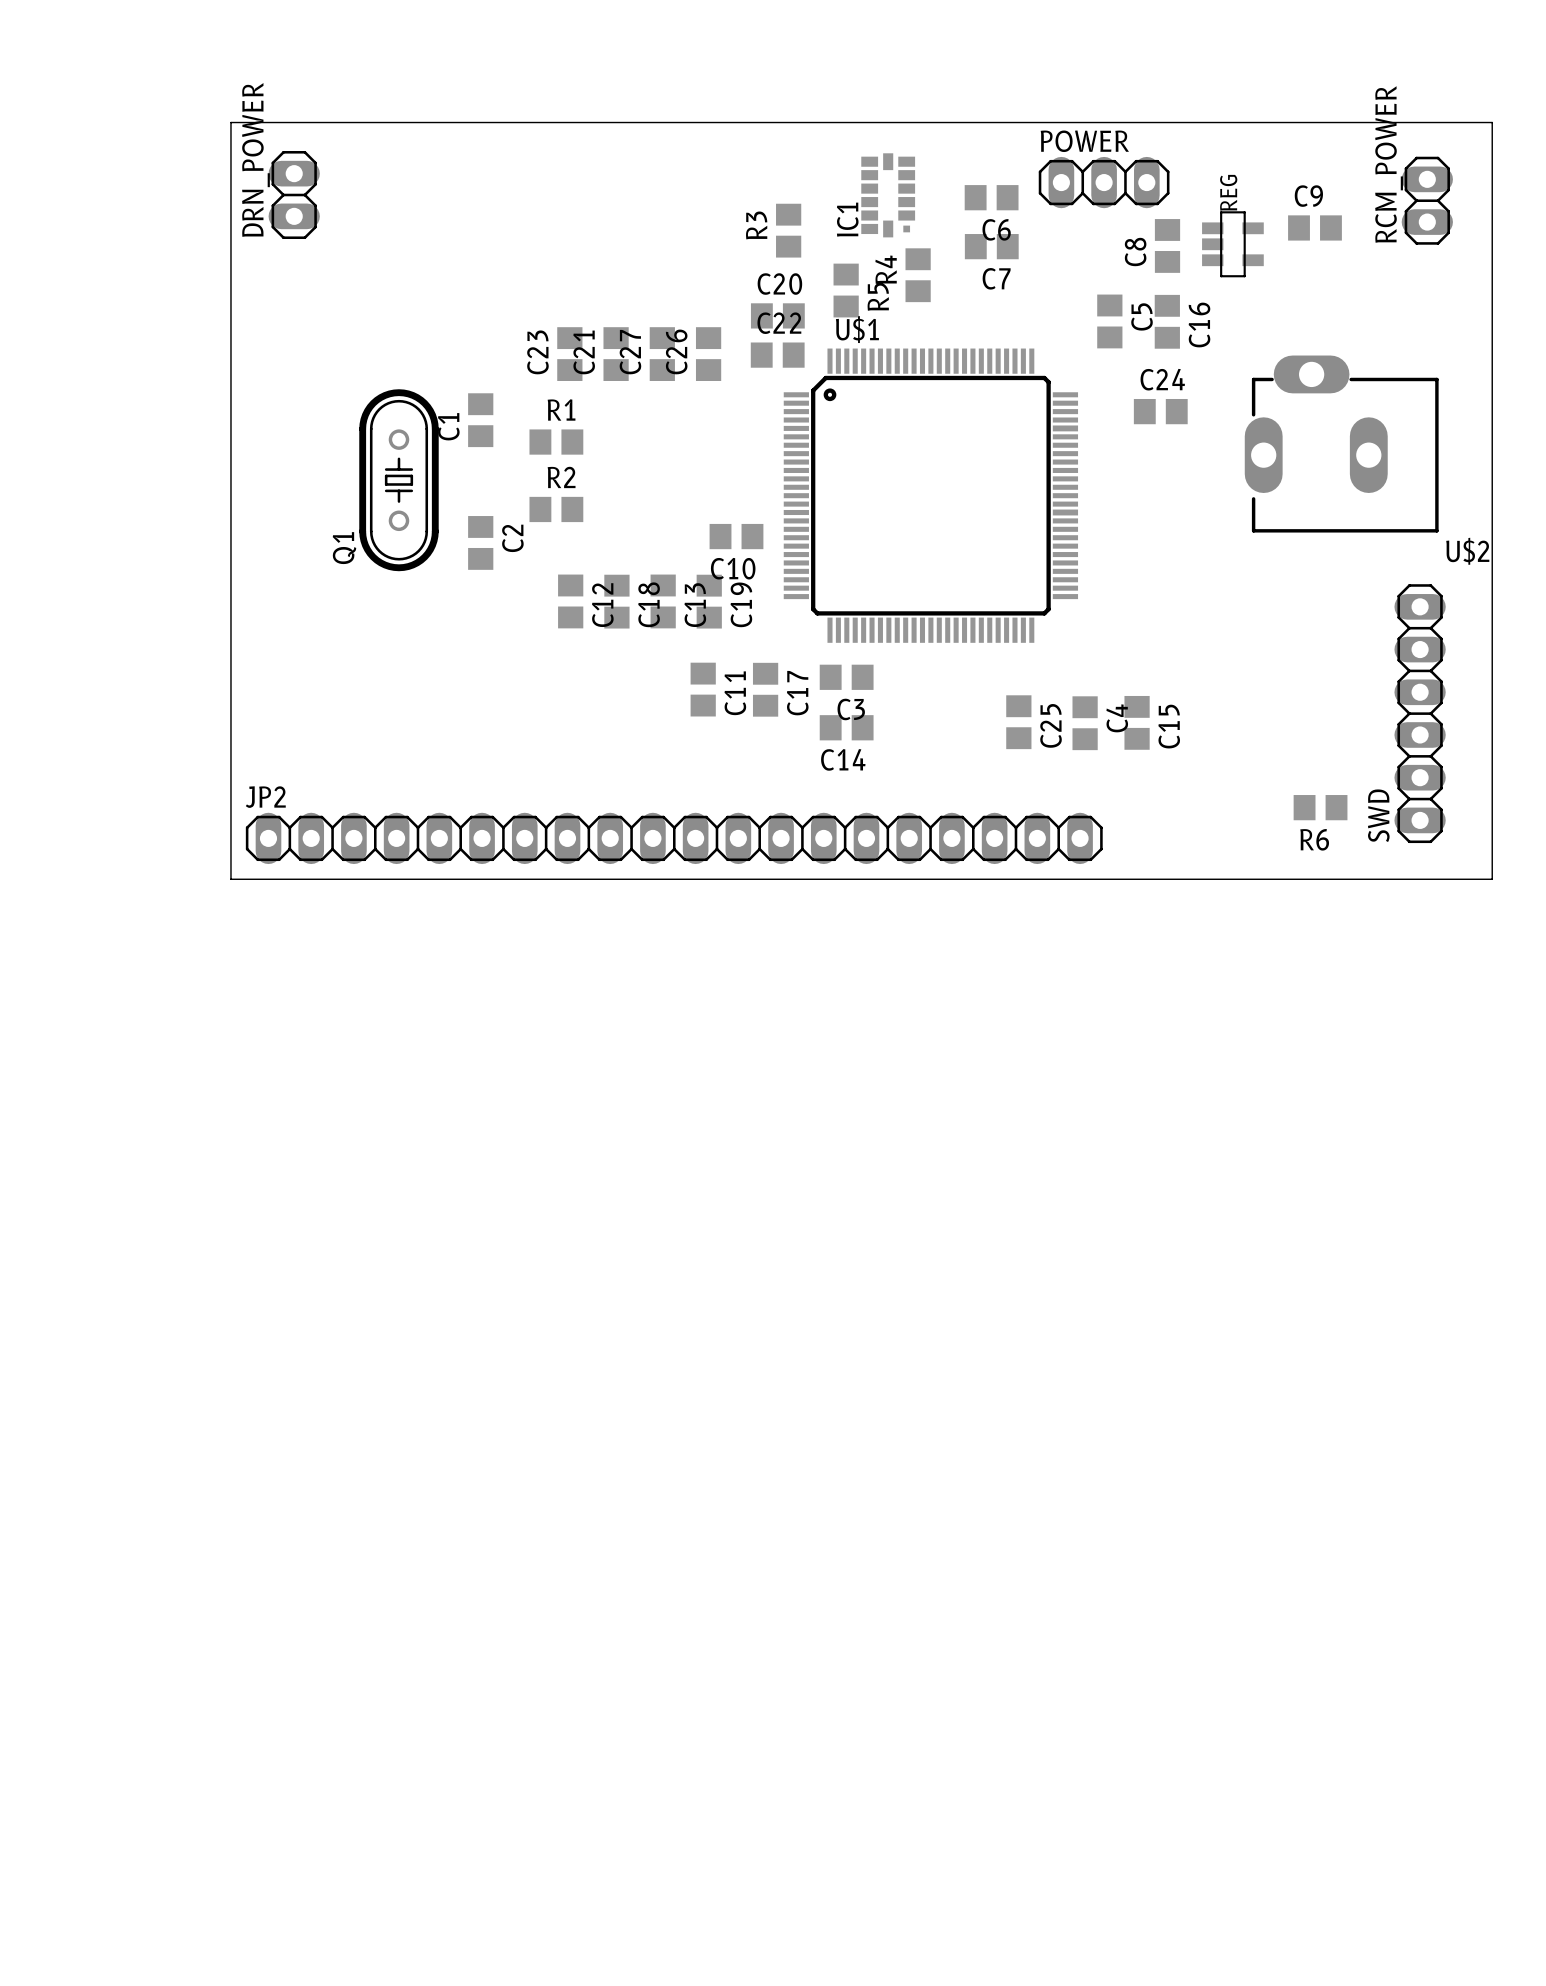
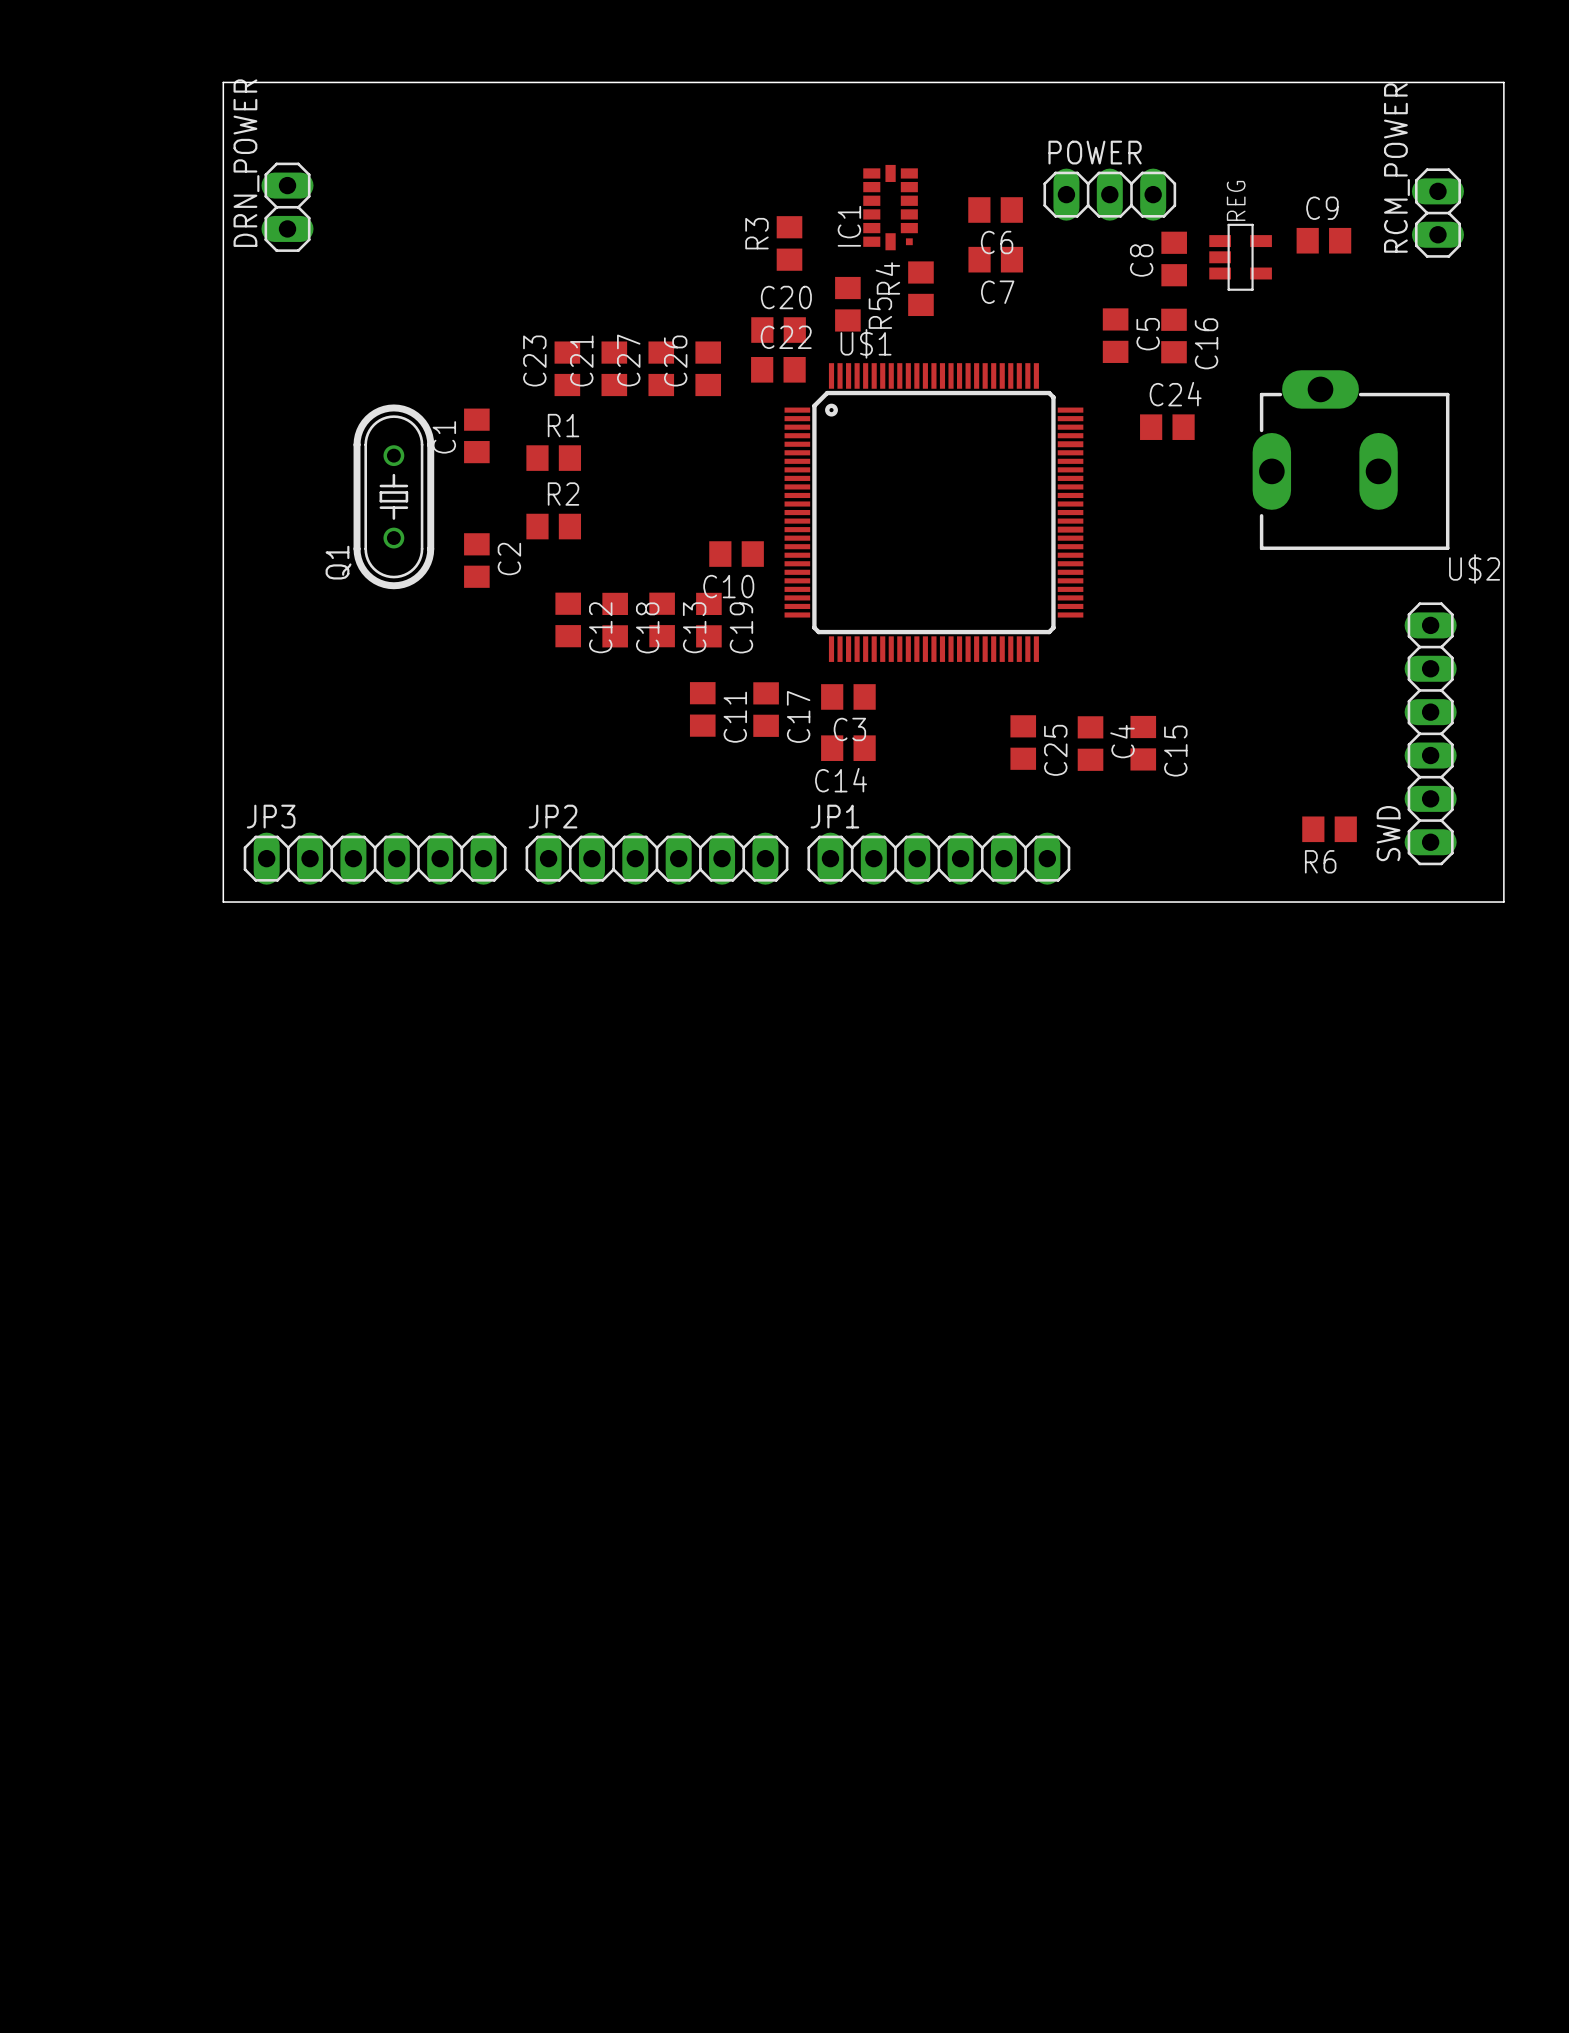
board edge: (230, 122) (1492, 122) -> (223, 133) (223, 82) (1503, 82) (1503, 133)
JP2 name position: JP2 (265, 797) -> JP2 (553, 816)
JP2 footprint: [245, 812, 1103, 865] -> [525, 832, 789, 885]
JP3: none -> (375, 858)
JP1: none -> (938, 858)

